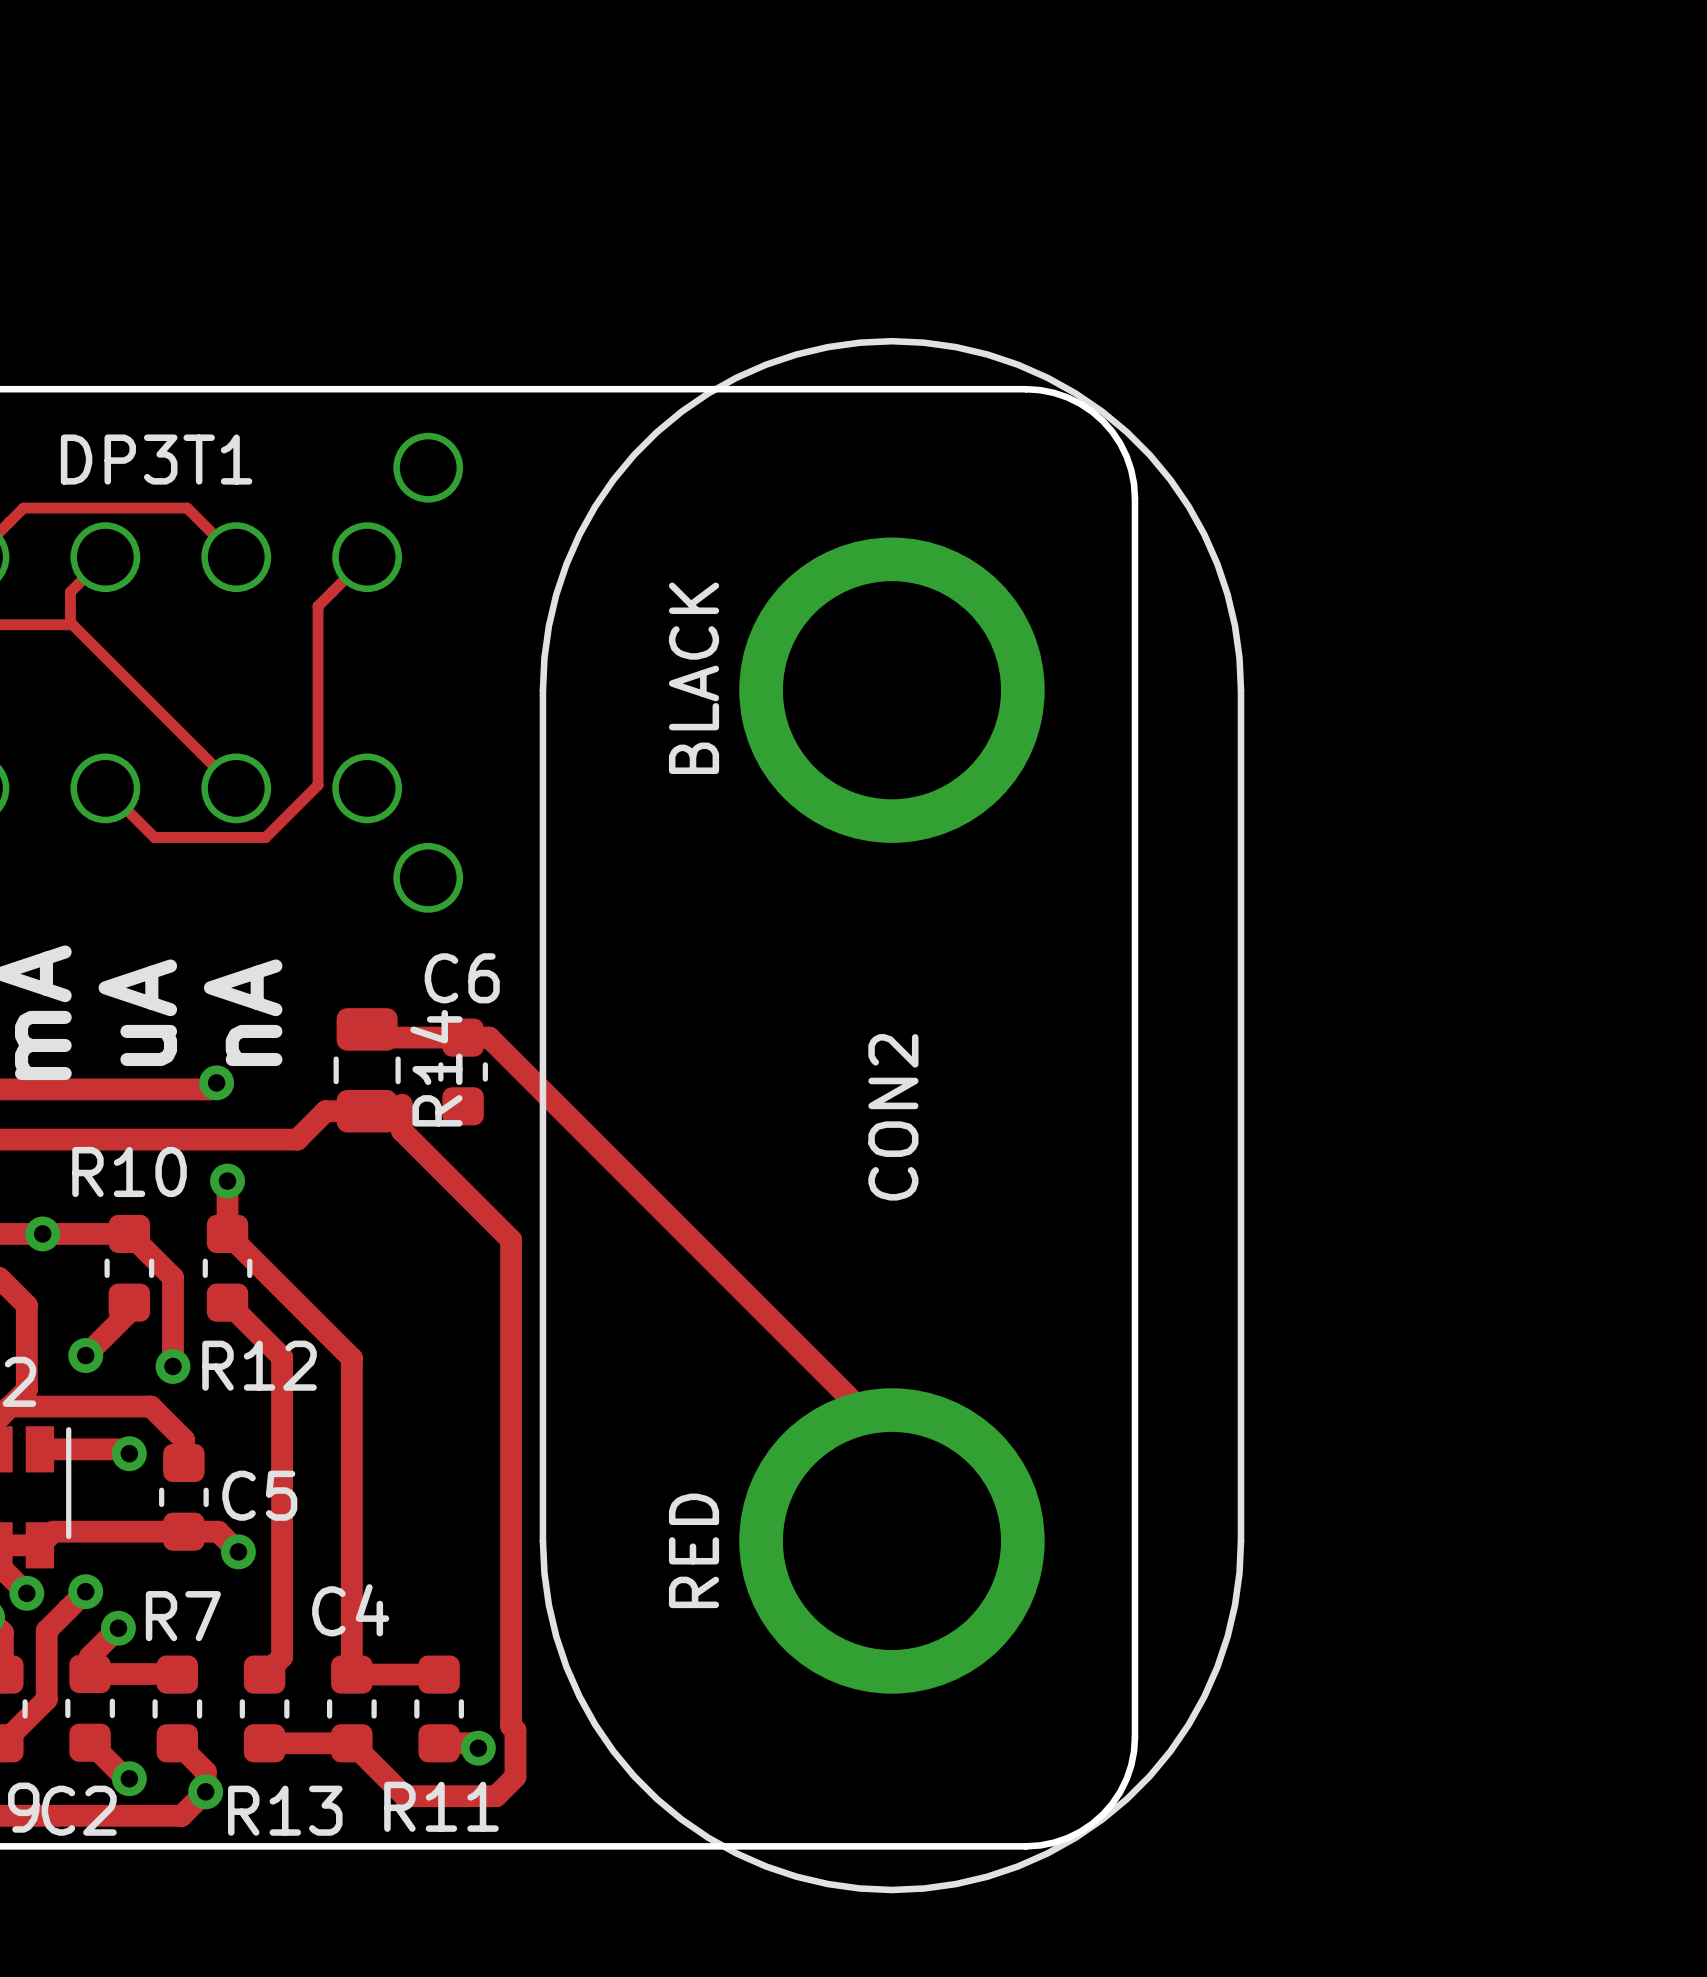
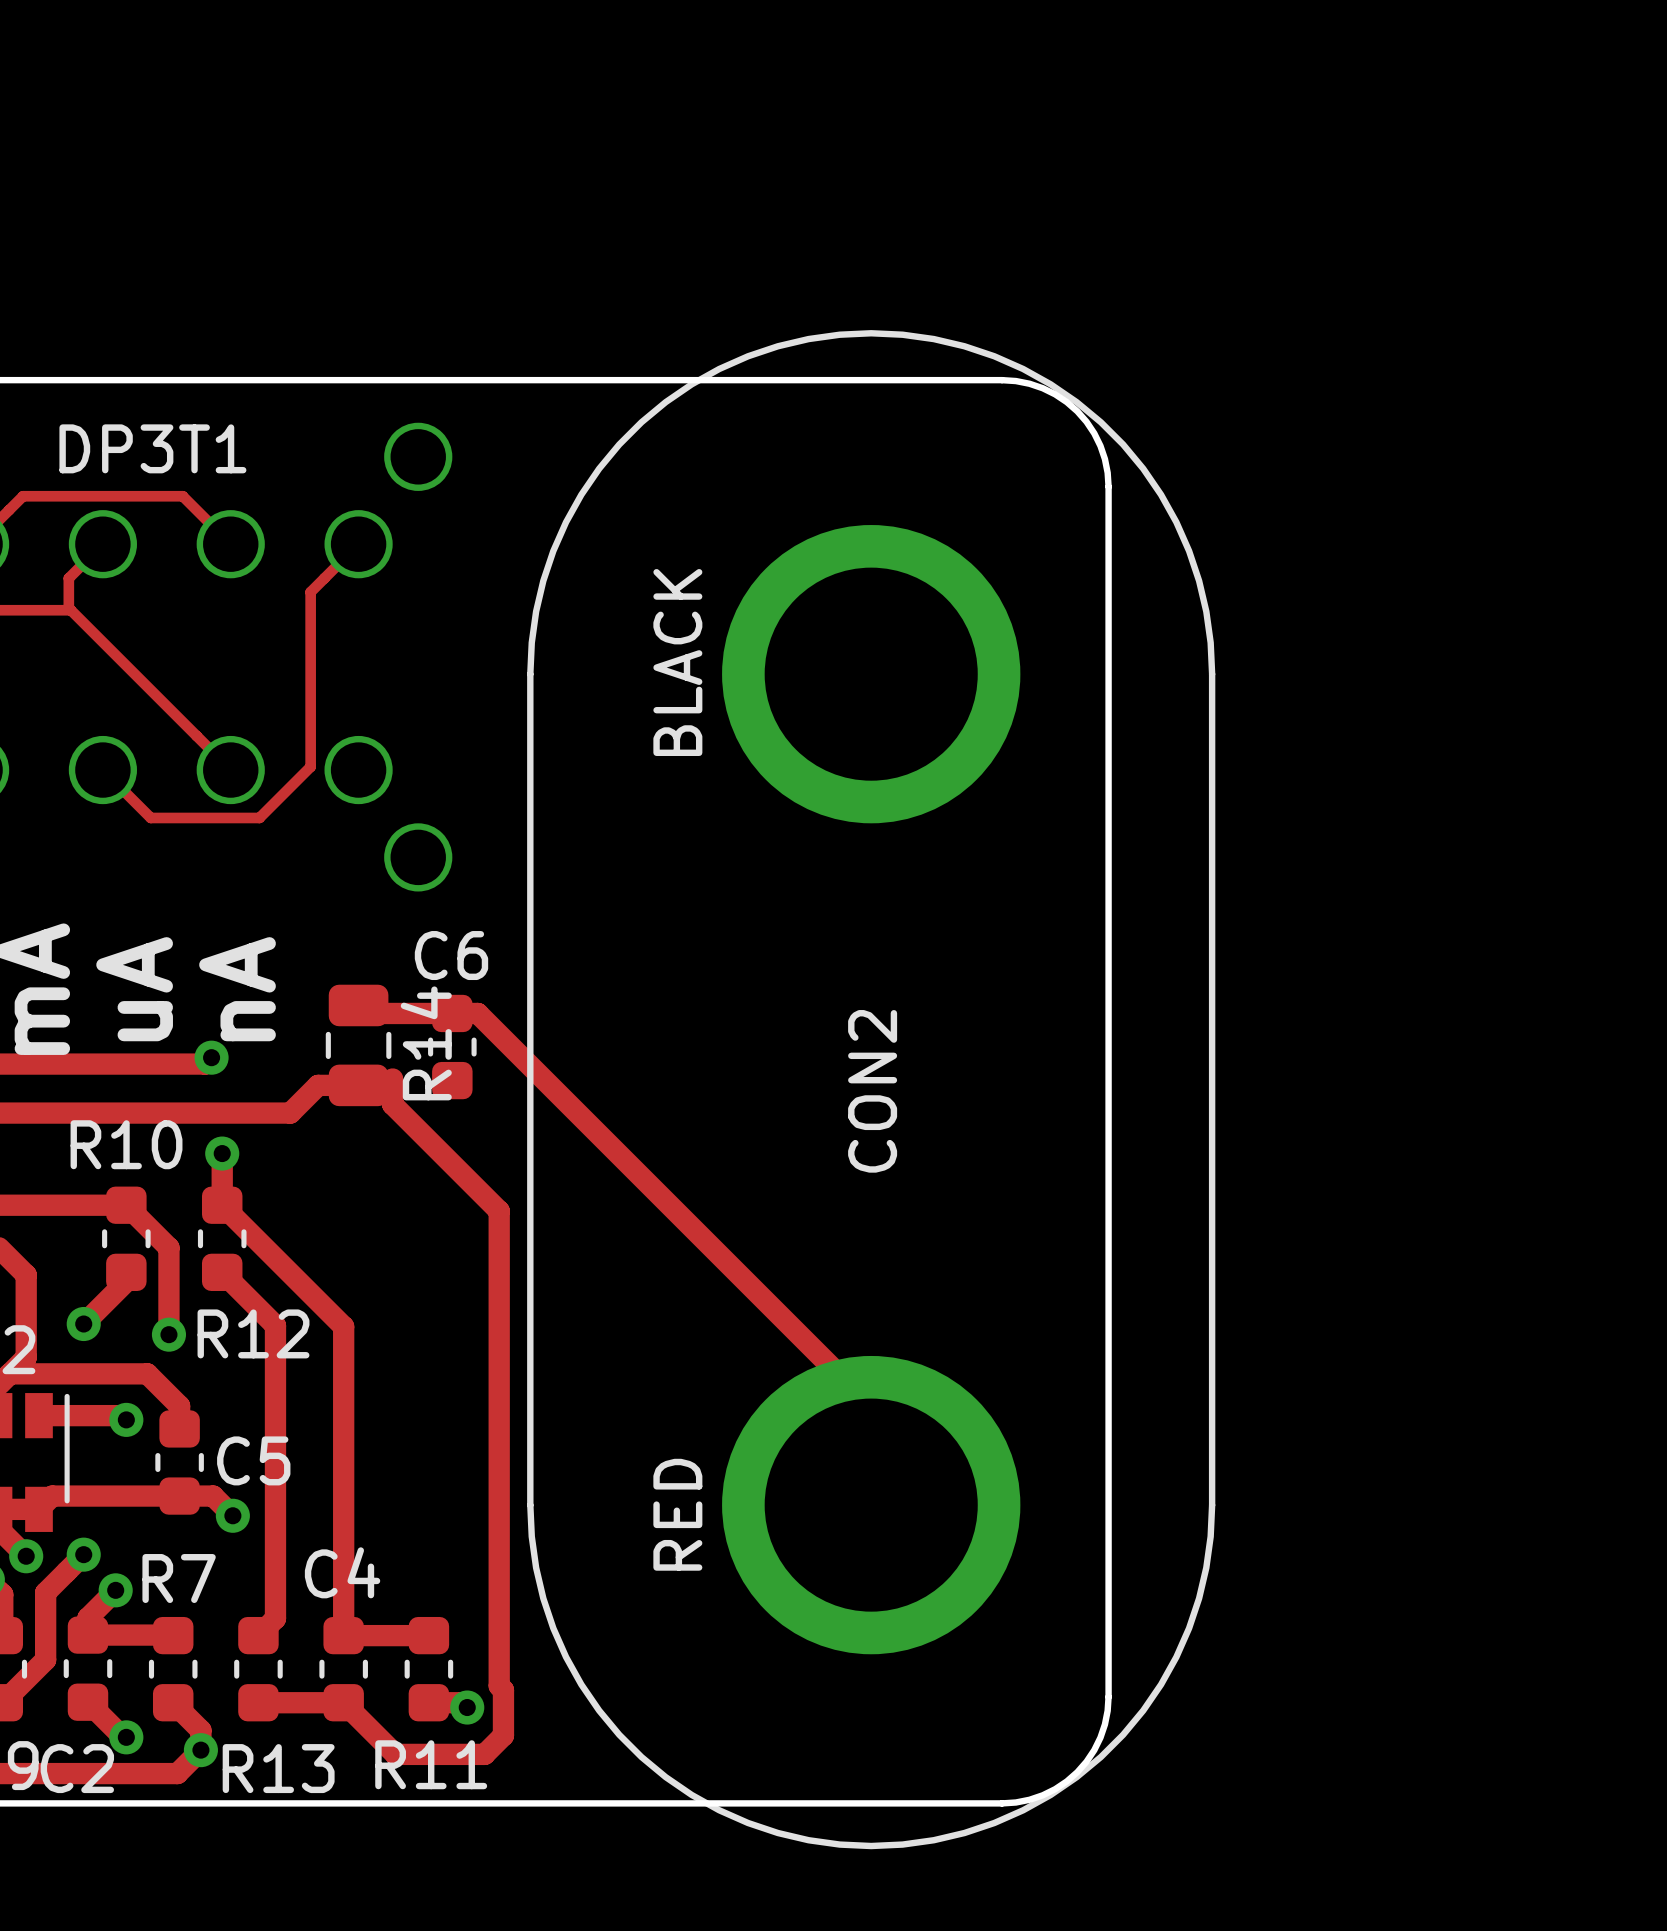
via: (42, 1233) -> none

